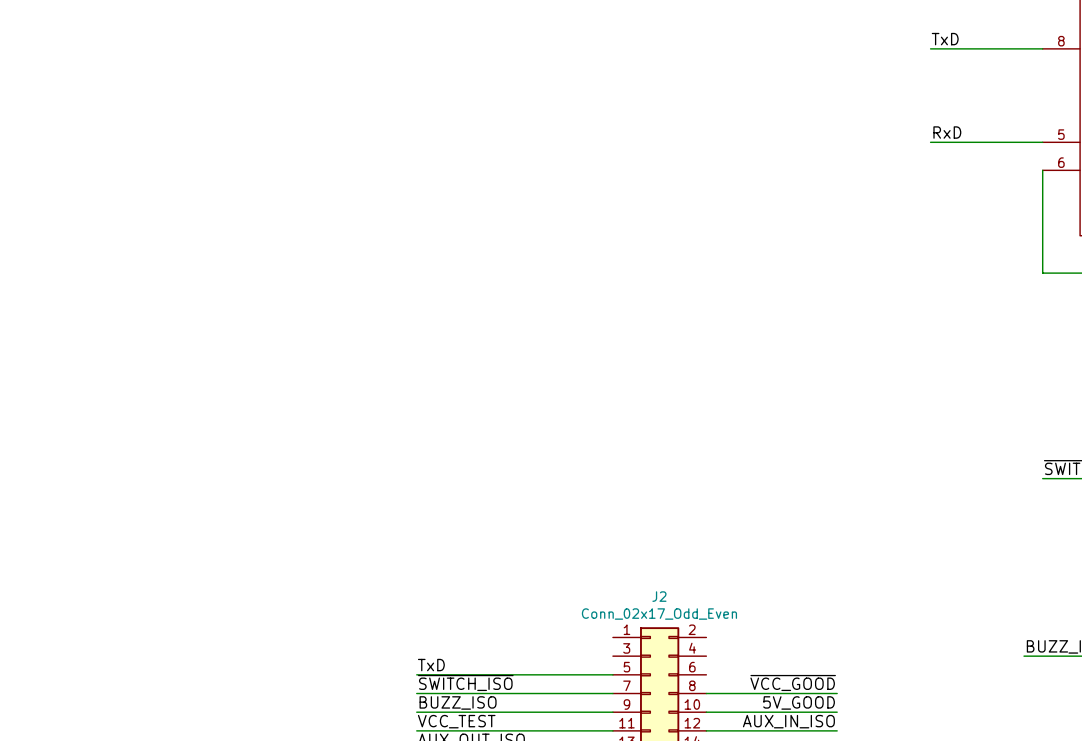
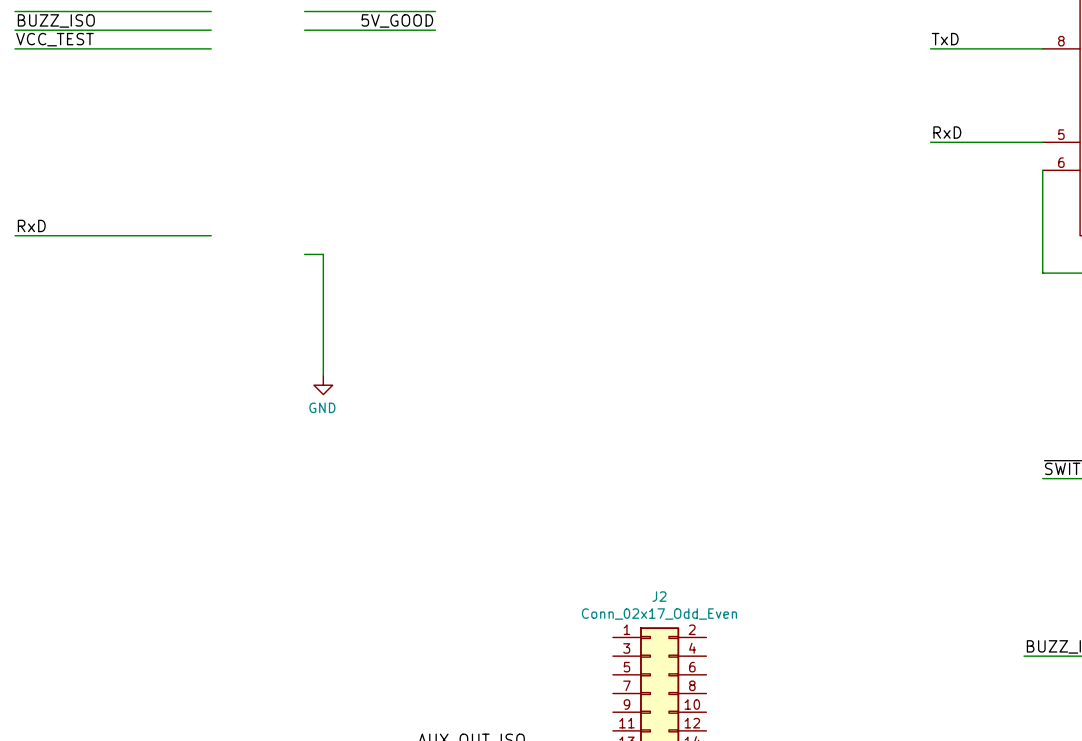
wire: none -> (15, 11) (211, 11)
wire: none -> (304, 11) (435, 11)
label: none -> BUZZ_ISO (56, 20)
label: none -> 5V_GOOD (397, 20)
wire: none -> (15, 30) (211, 30)
wire: none -> (304, 30) (435, 30)
label: none -> VCC_TEST (55, 39)
wire: none -> (15, 48) (211, 48)
label: none -> RxD (31, 225)
wire: none -> (15, 235) (211, 235)
wire: none -> (304, 254) (323, 254) (323, 375)
power symbol: none -> GND (323, 385)
label: TxD (431, 665) -> none
wire: (416, 674) (612, 674) -> none
label: ~{SWITCH_ISO} (465, 682) -> none
label: ~{VCC_GOOD} (793, 682) -> none
wire: (416, 693) (612, 693) -> none
wire: (706, 693) (837, 693) -> none
label: BUZZ_ISO (458, 702) -> none
label: 5V_GOOD (799, 702) -> none
wire: (416, 712) (612, 712) -> none
wire: (706, 712) (837, 712) -> none
label: VCC_TEST (456, 721) -> none
label: AUX_IN_ISO (788, 721) -> none
wire: (416, 730) (612, 730) -> none
wire: (706, 730) (837, 730) -> none

